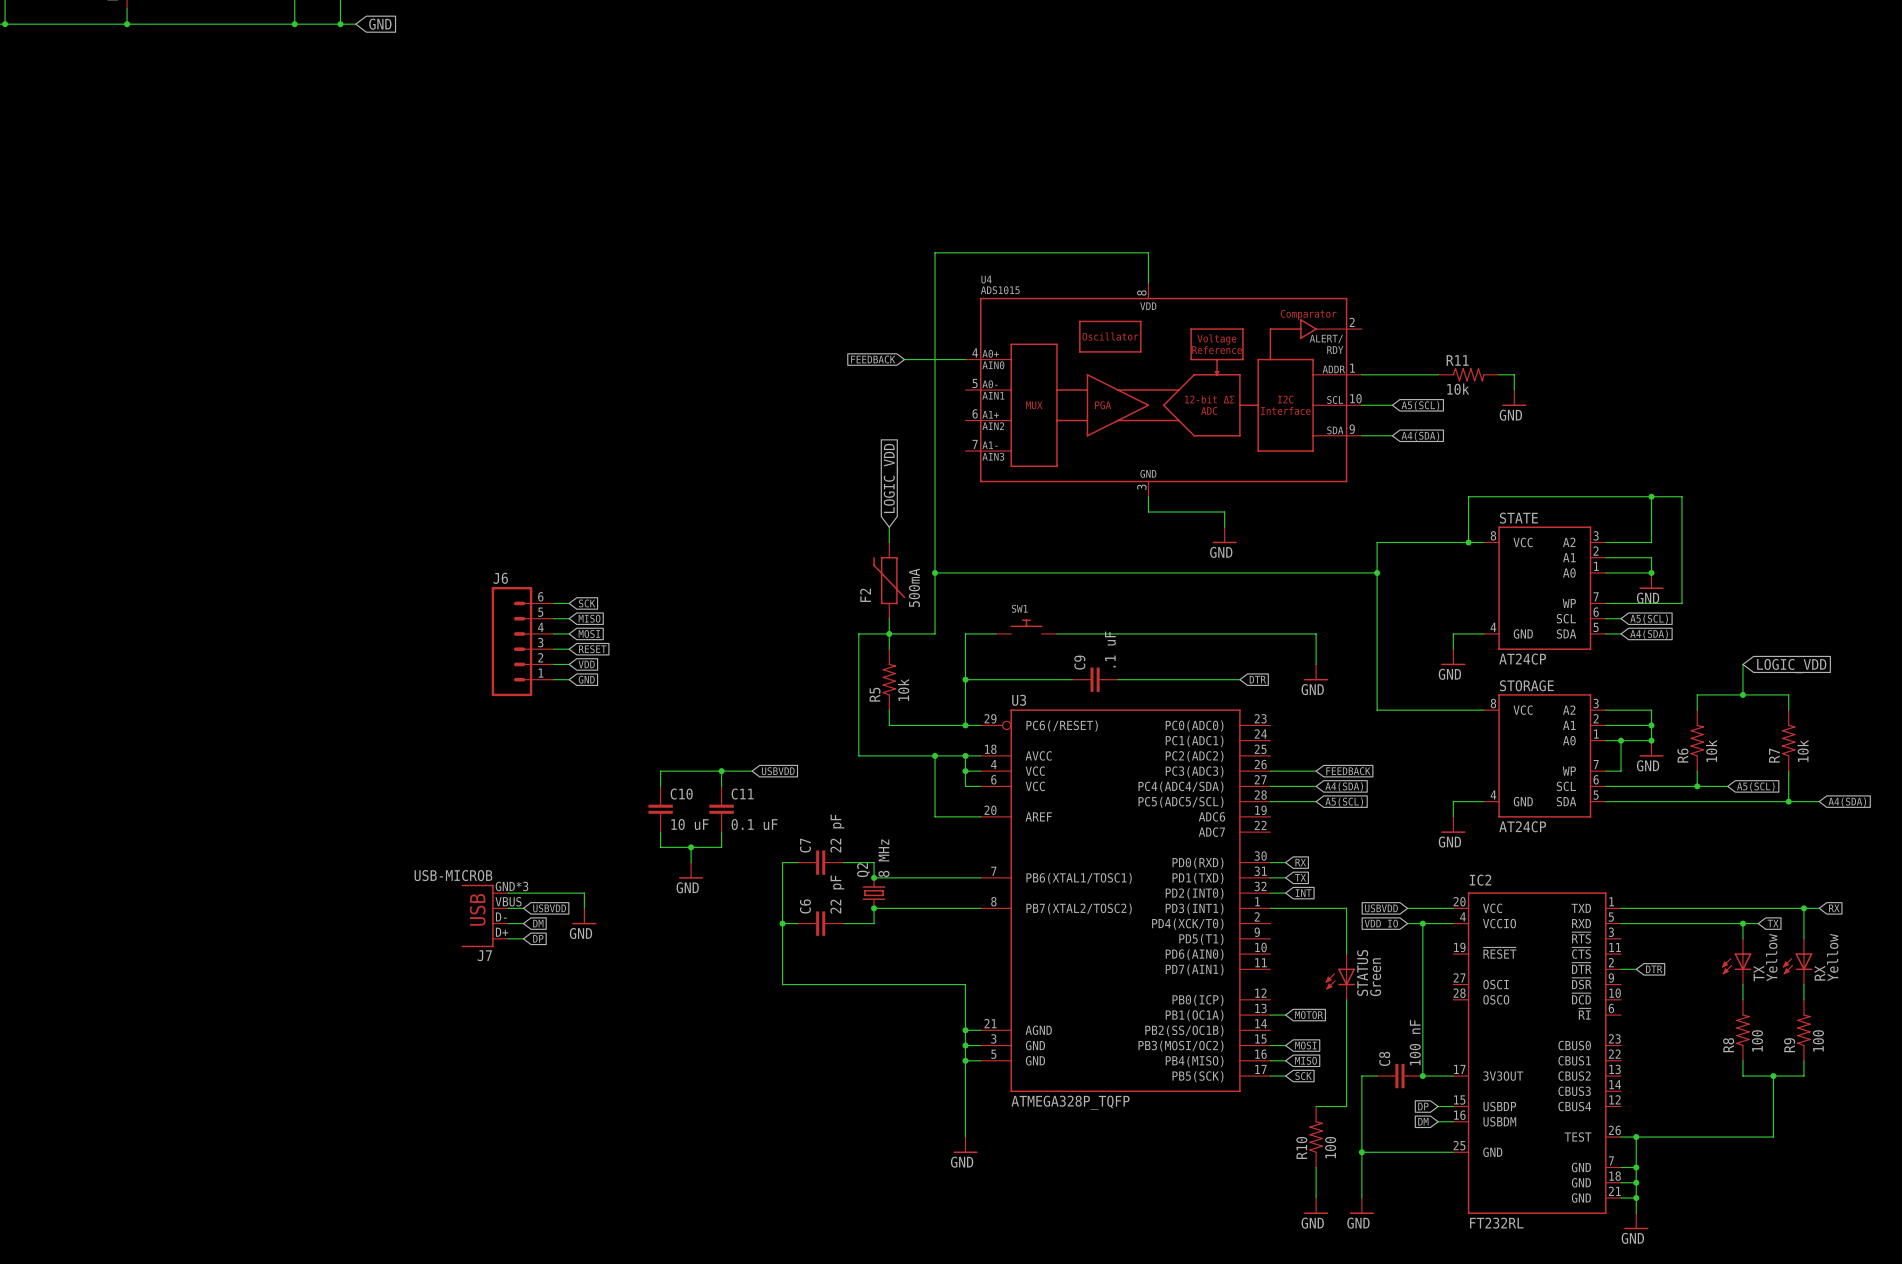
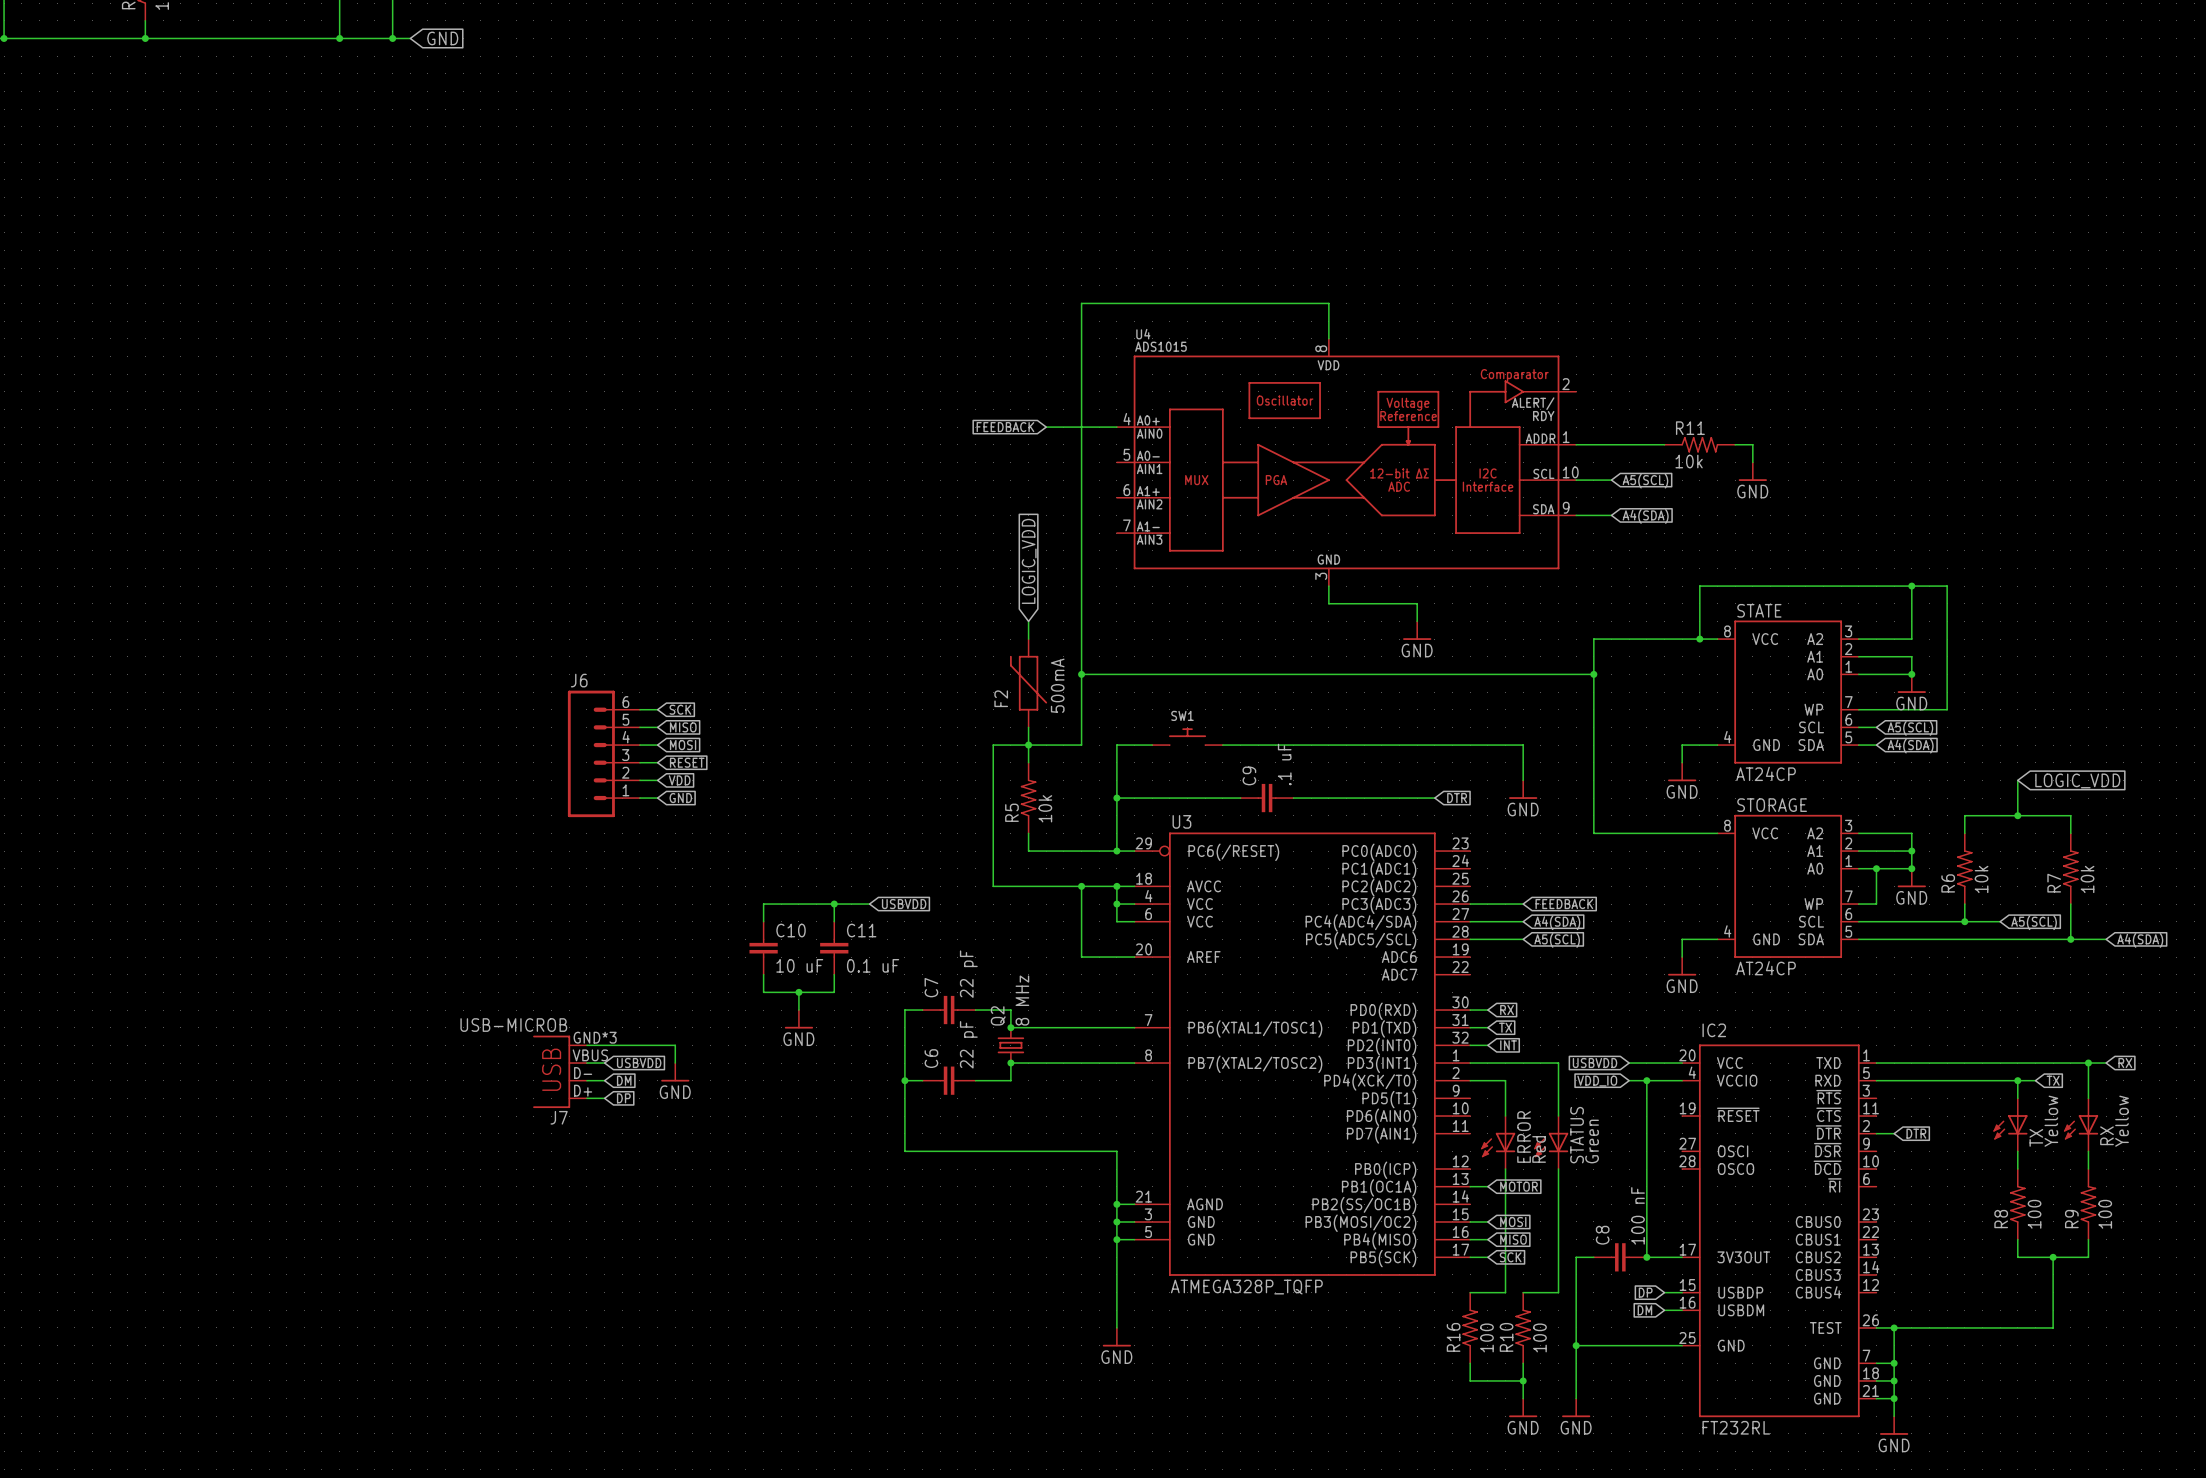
wire: none -> (1470, 1080) (1505, 1080) (1505, 1116)
ERROR: none -> Red (1498, 1142)
wire: none -> (1505, 1169) (1505, 1292) (1470, 1292)
R16: none -> 100 (1470, 1327)
wire: none -> (1470, 1363) (1470, 1380) (1523, 1380)
junction: none -> (1523, 1380)

